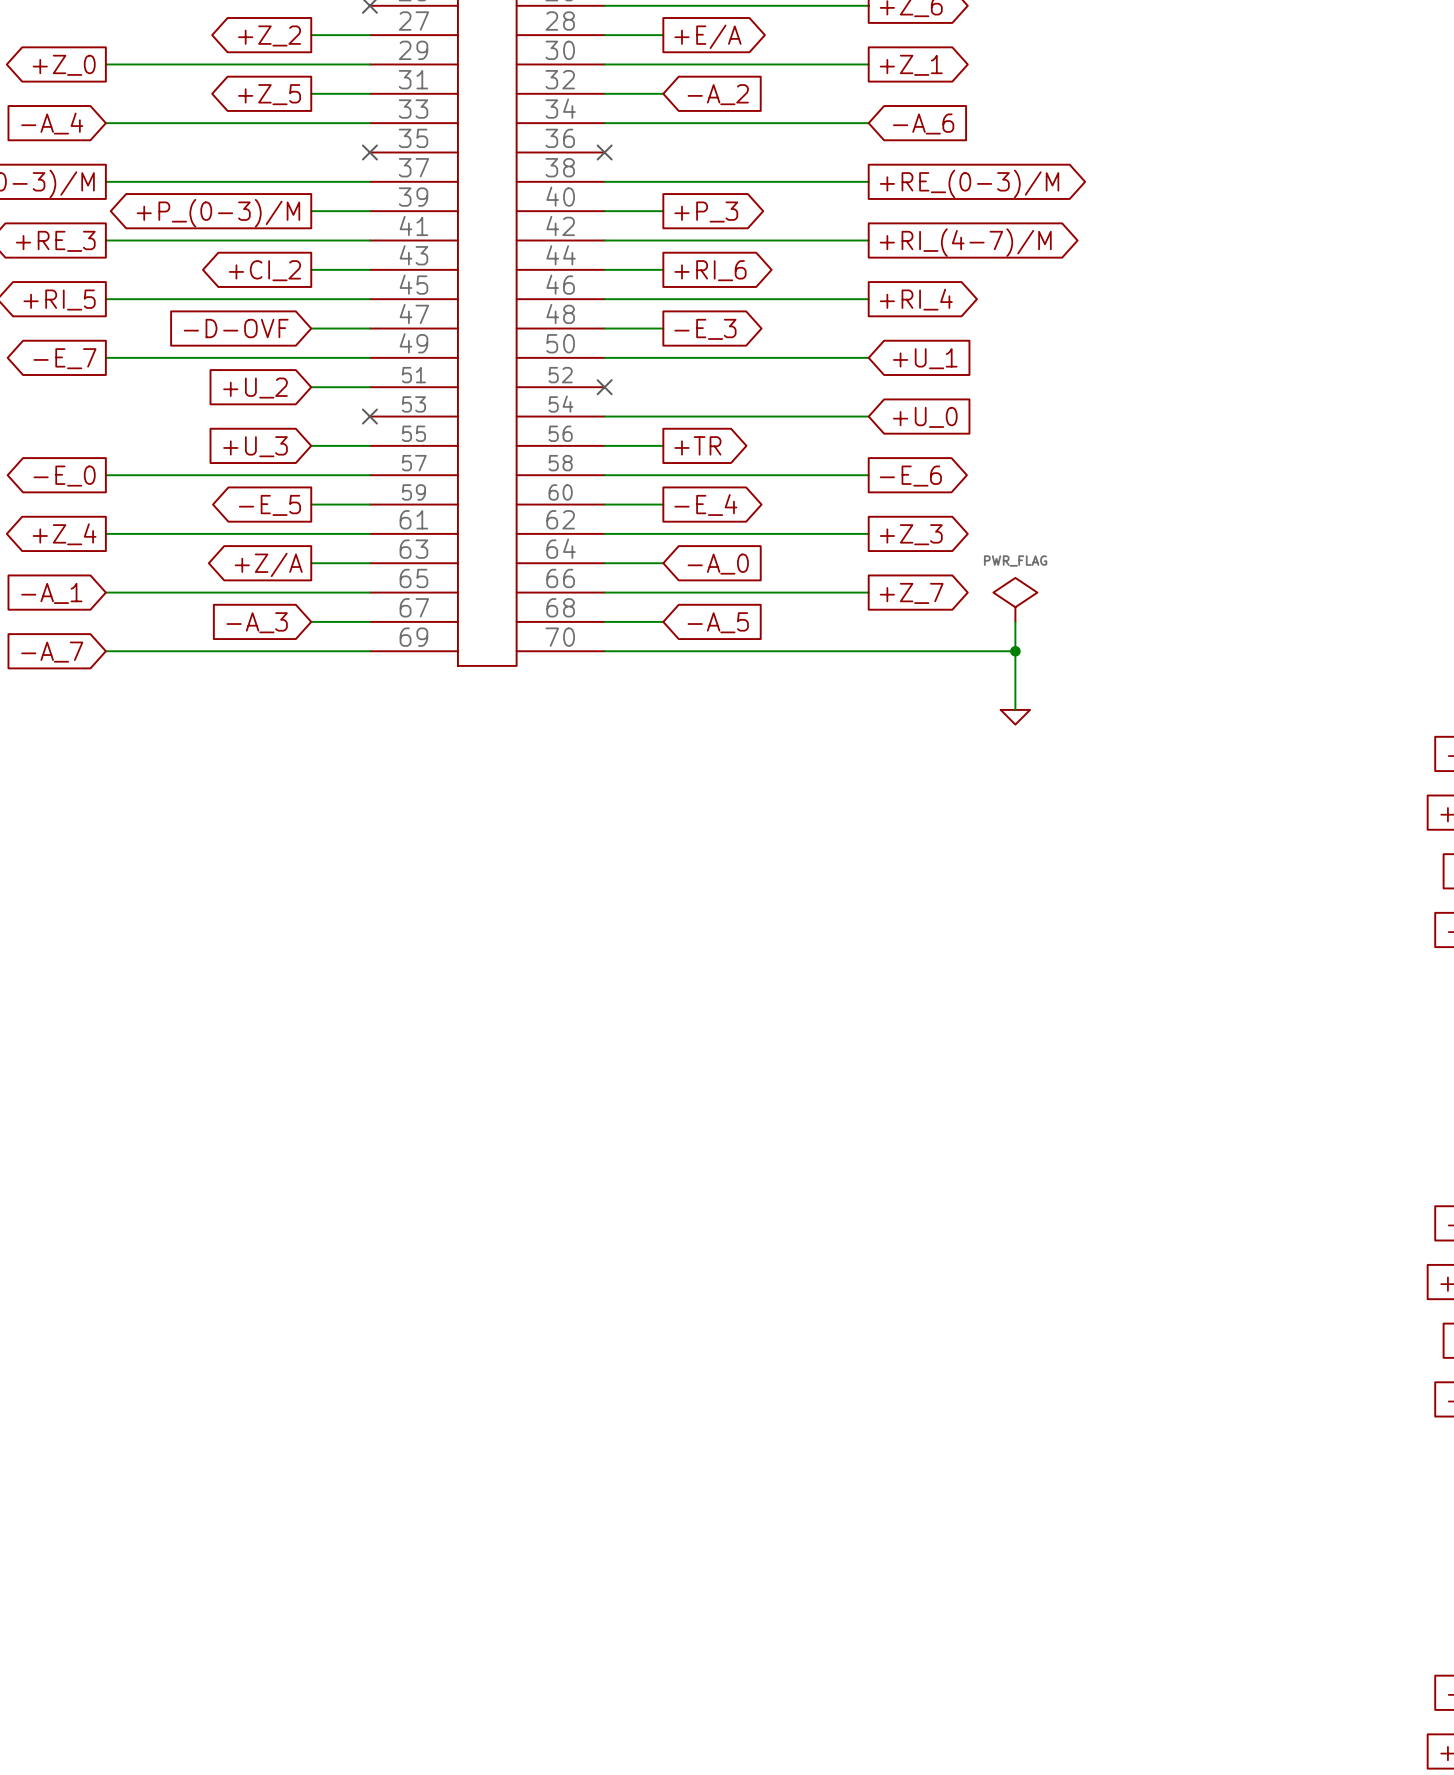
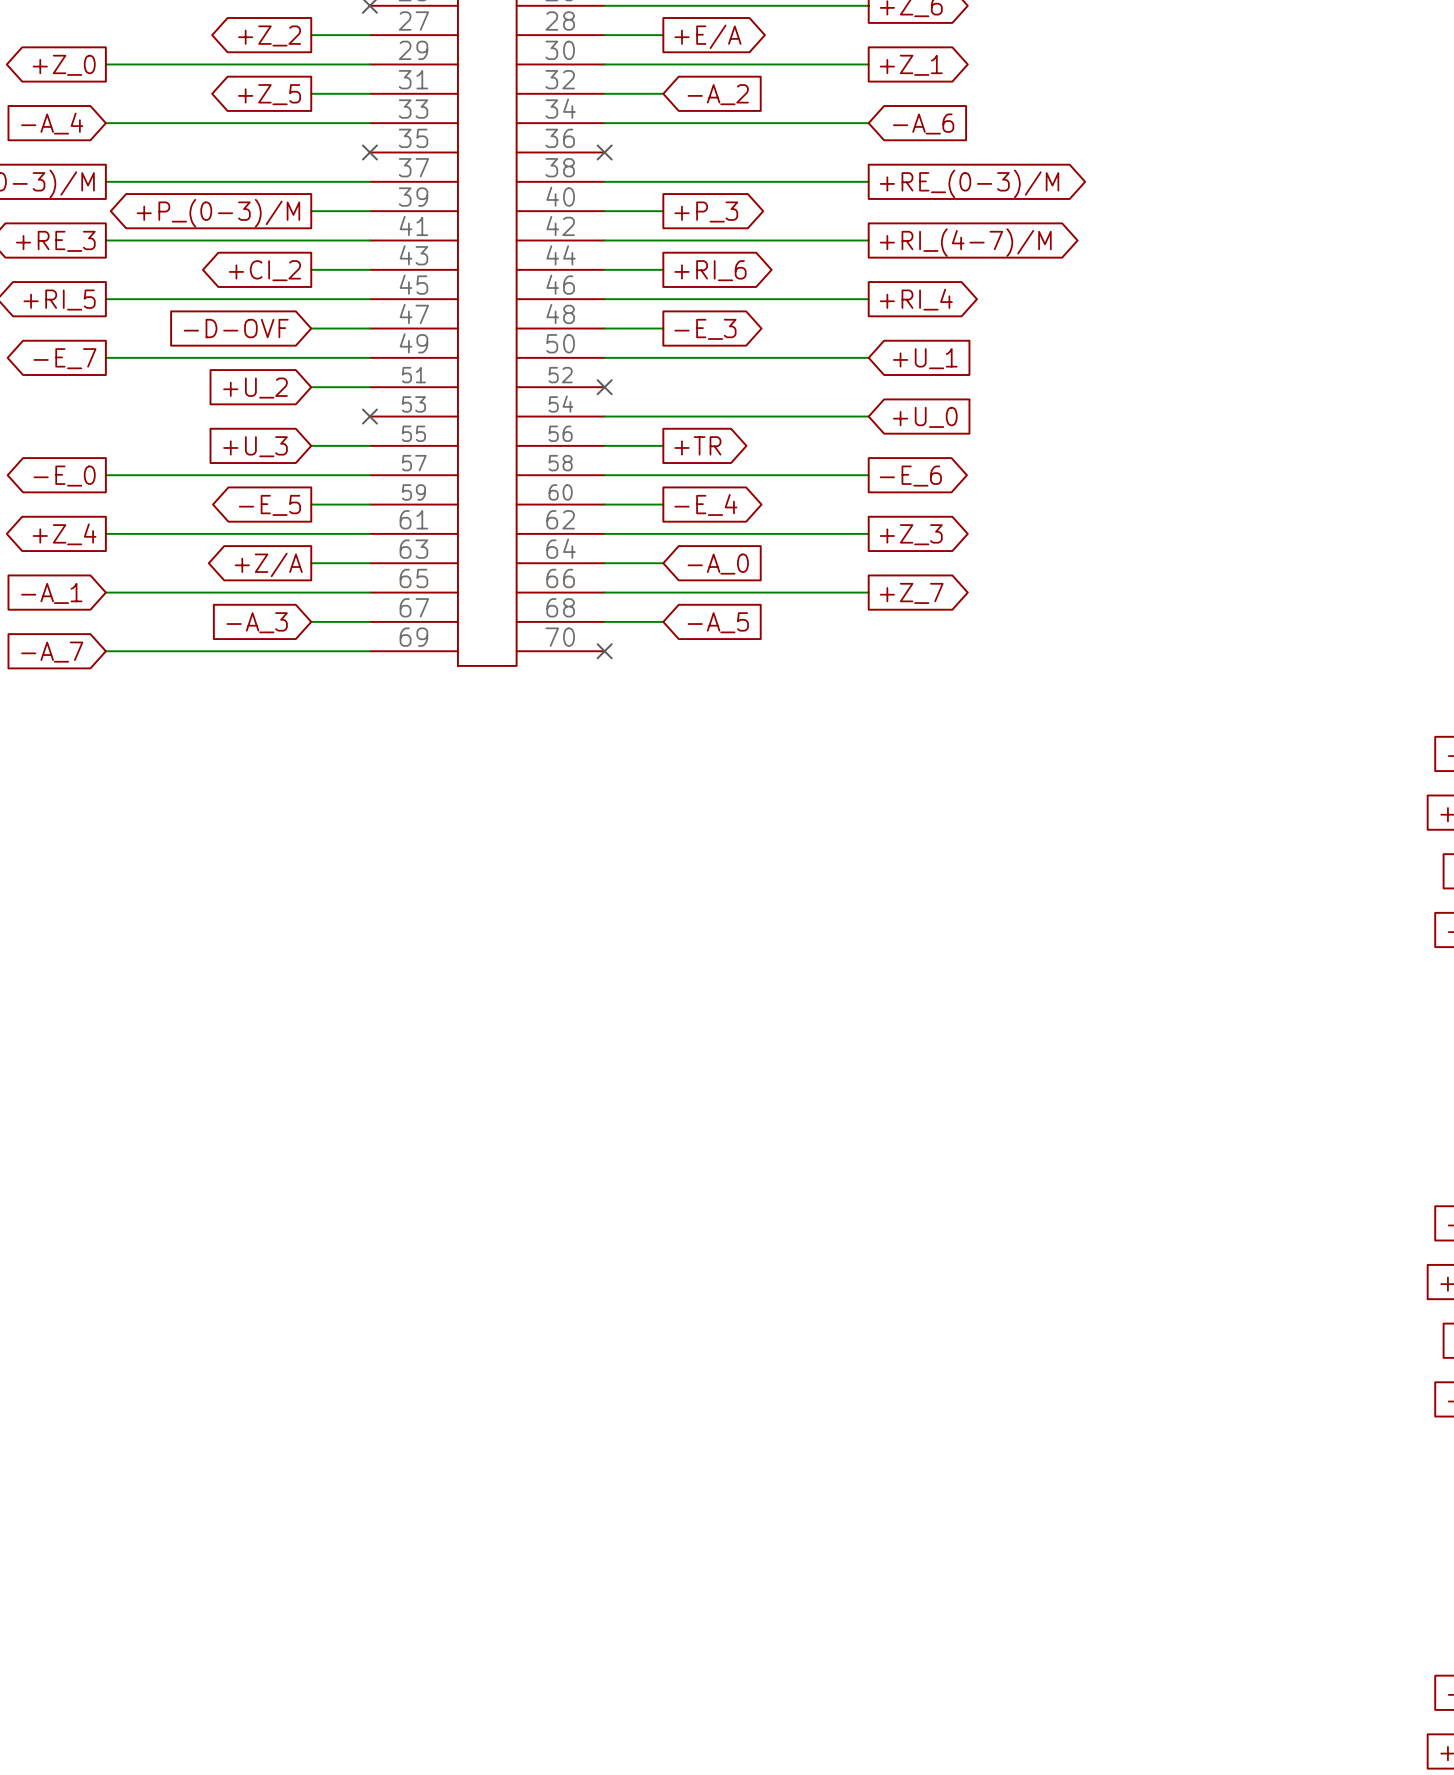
power symbol: PWR_FLAG (1015, 599) -> none
wire: (1015, 621) (1015, 709) -> none
wire: (604, 651) (1015, 651) -> none
no-connect mark: none -> (604, 651)
junction: (1015, 651) -> none
power symbol: (1015, 717) -> none

